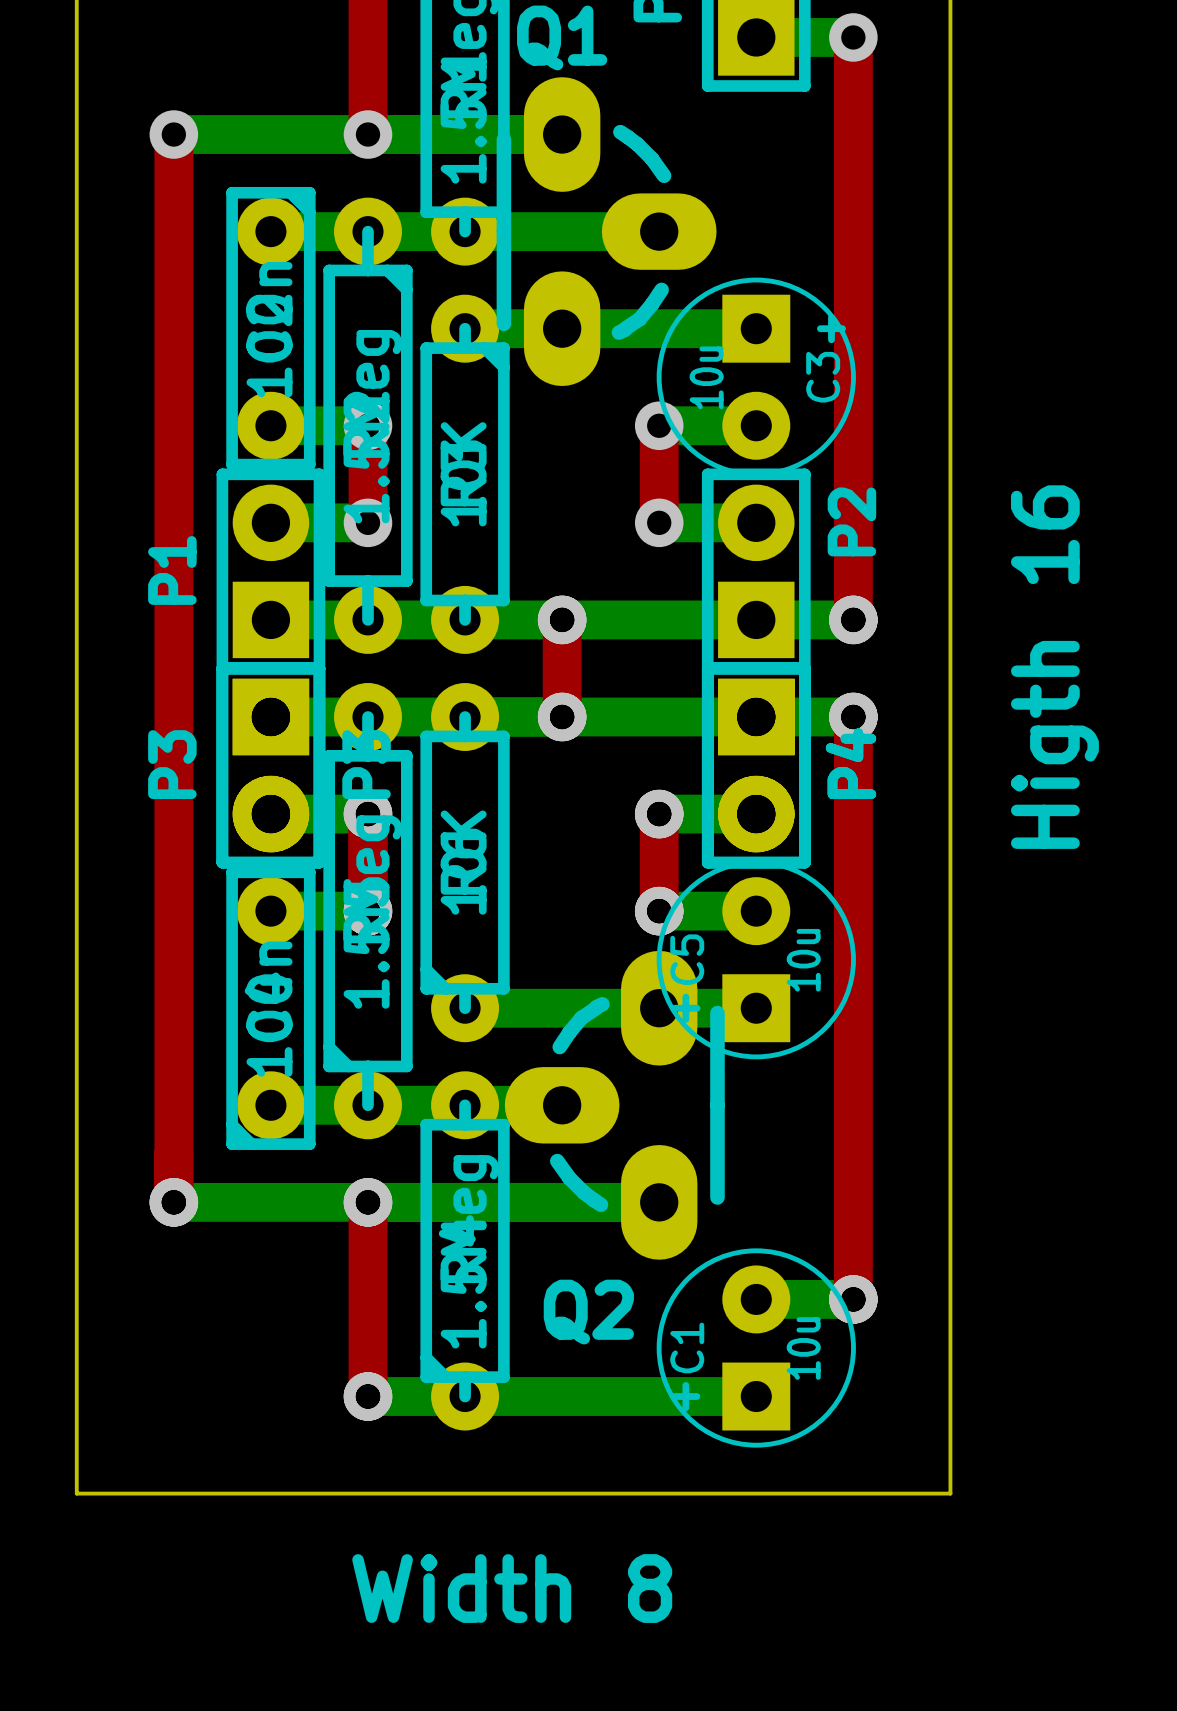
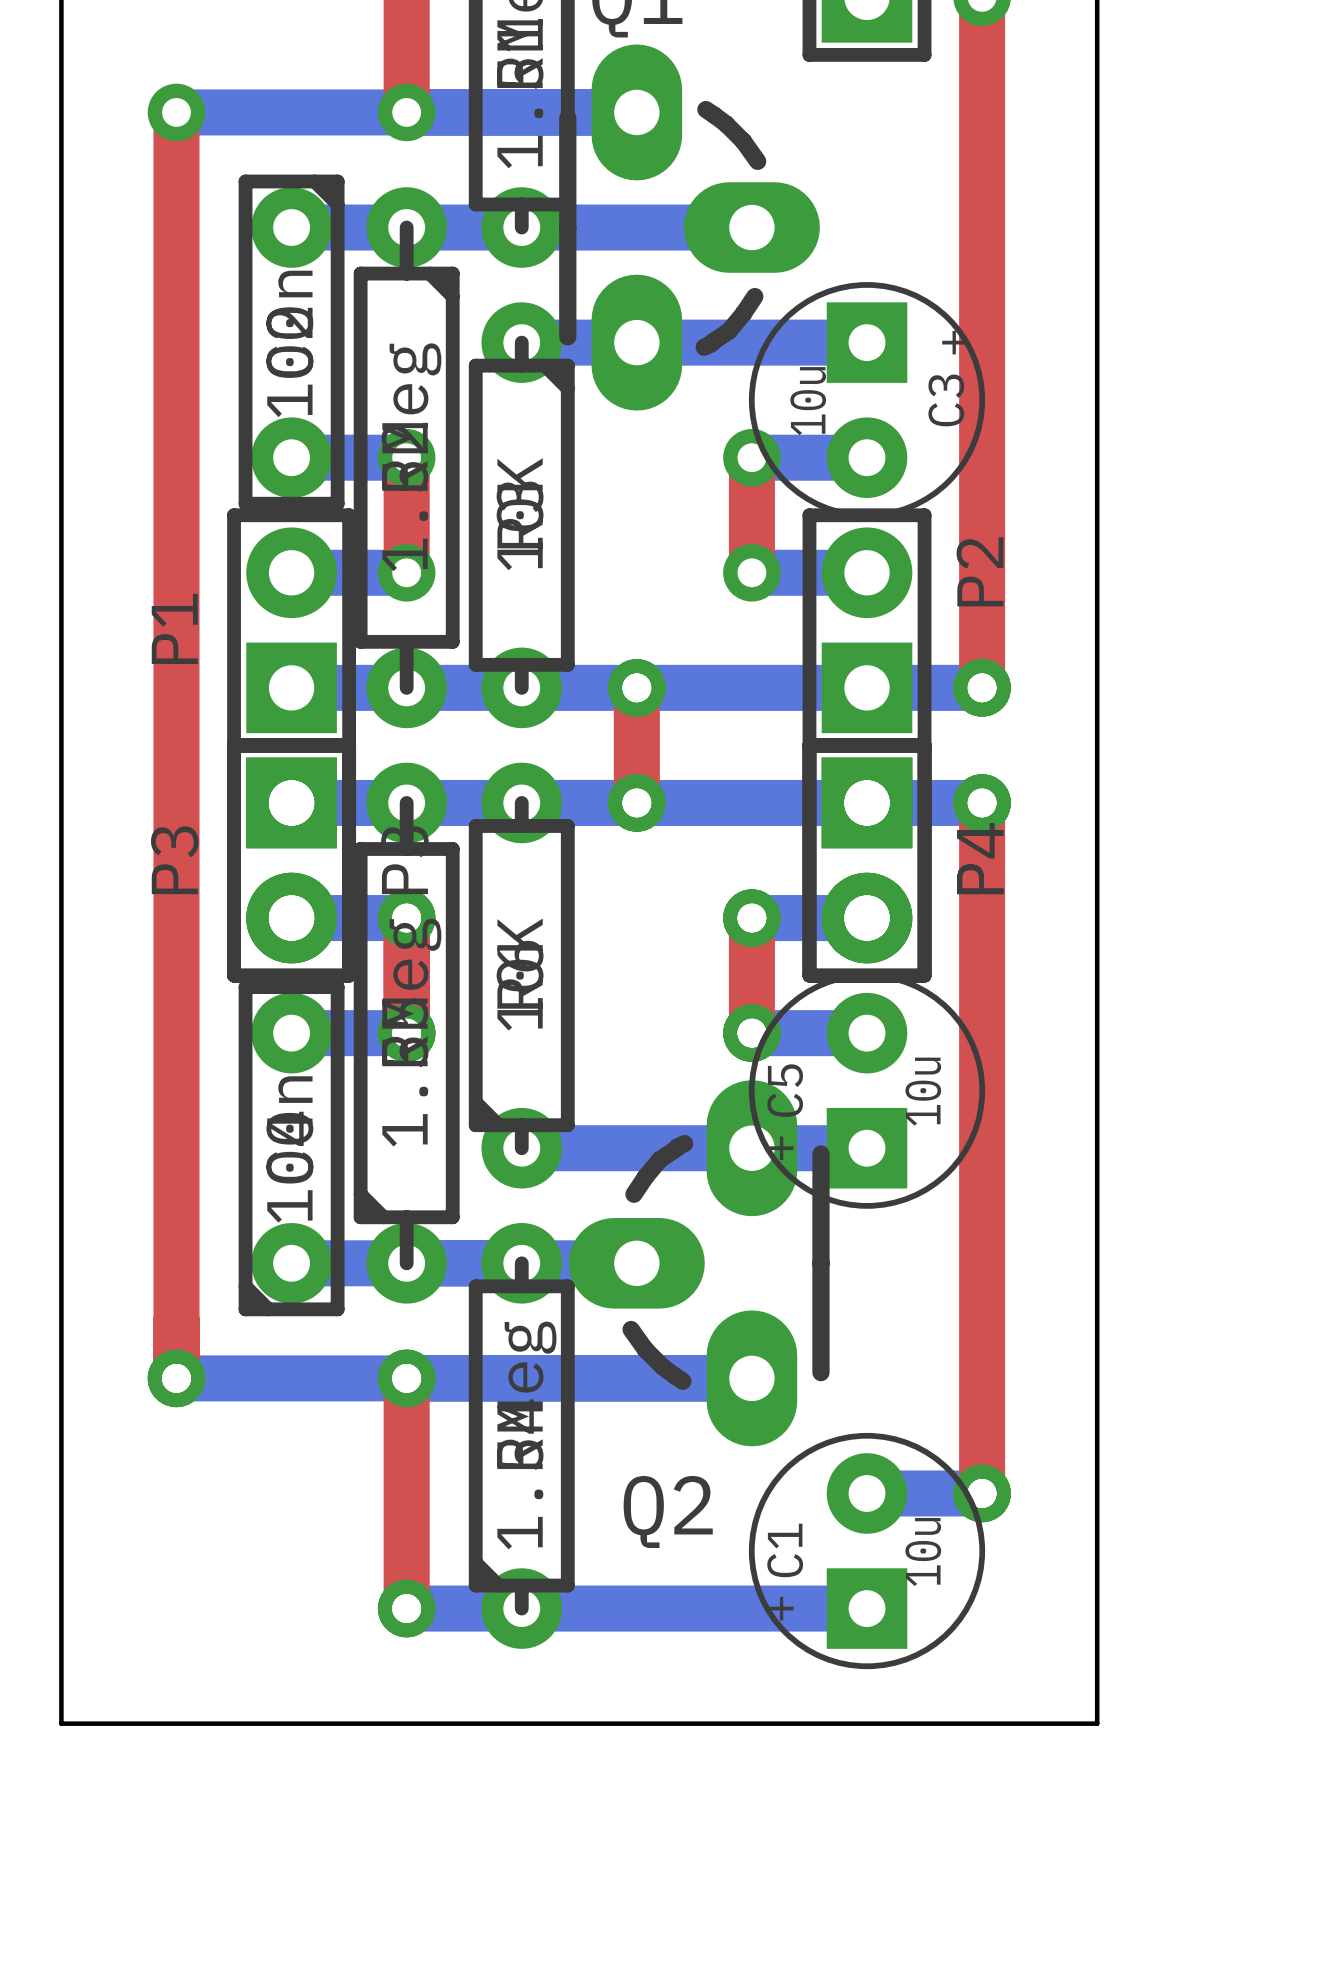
text: Higth 16 (1054, 667) -> none
text: Width 8 (512, 1588) -> none

